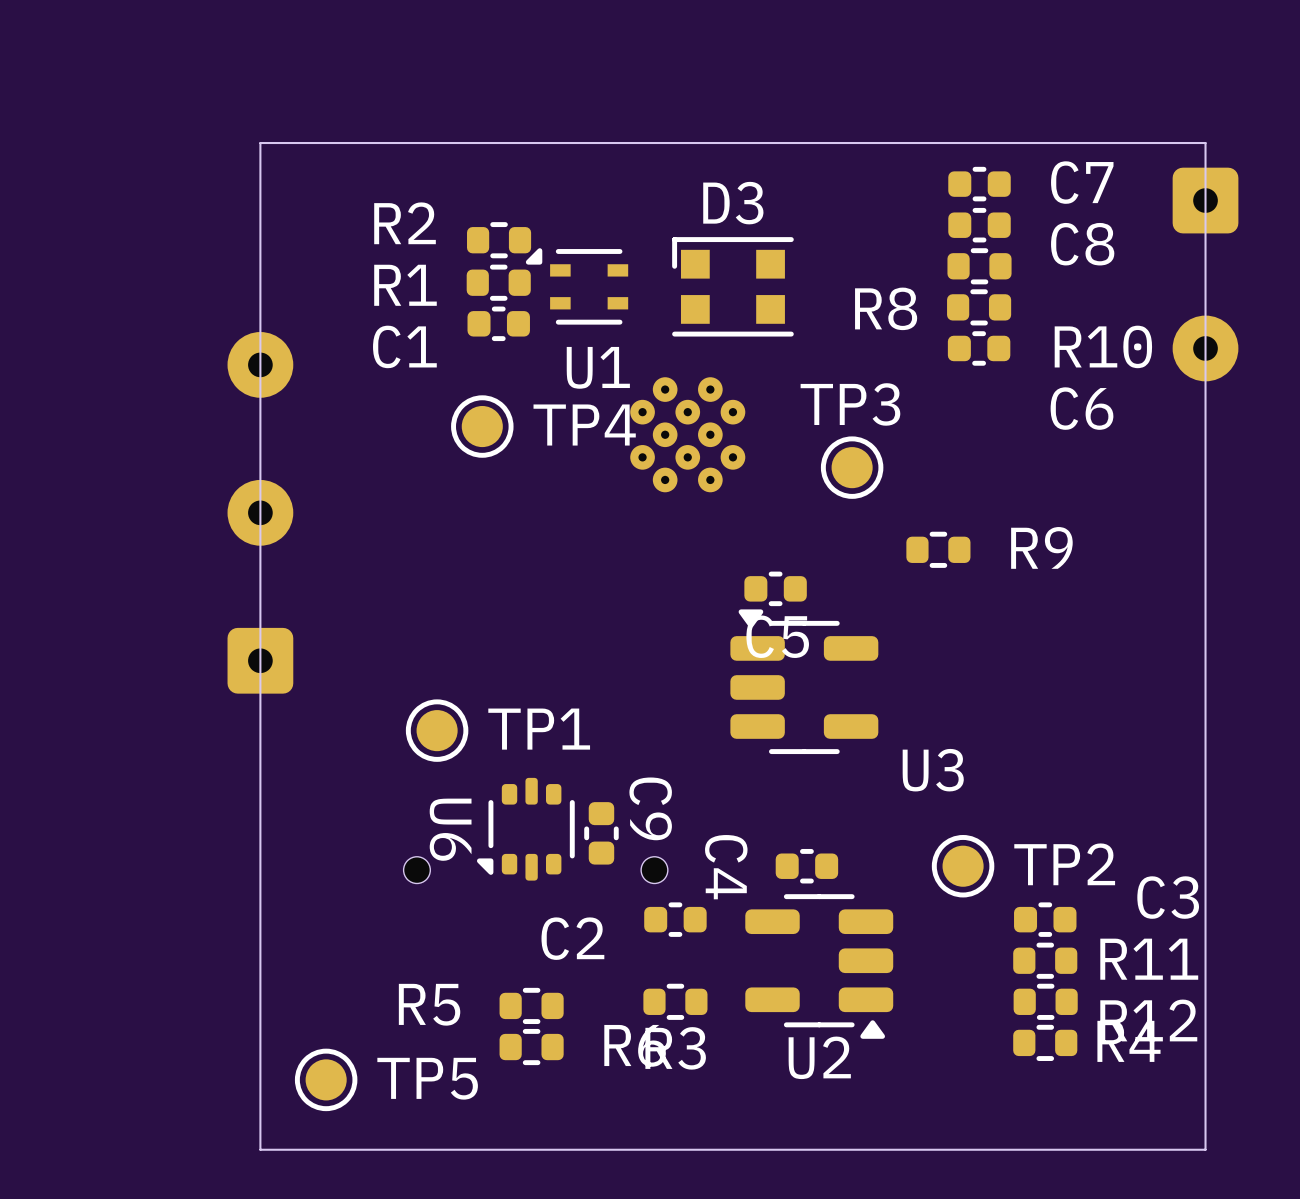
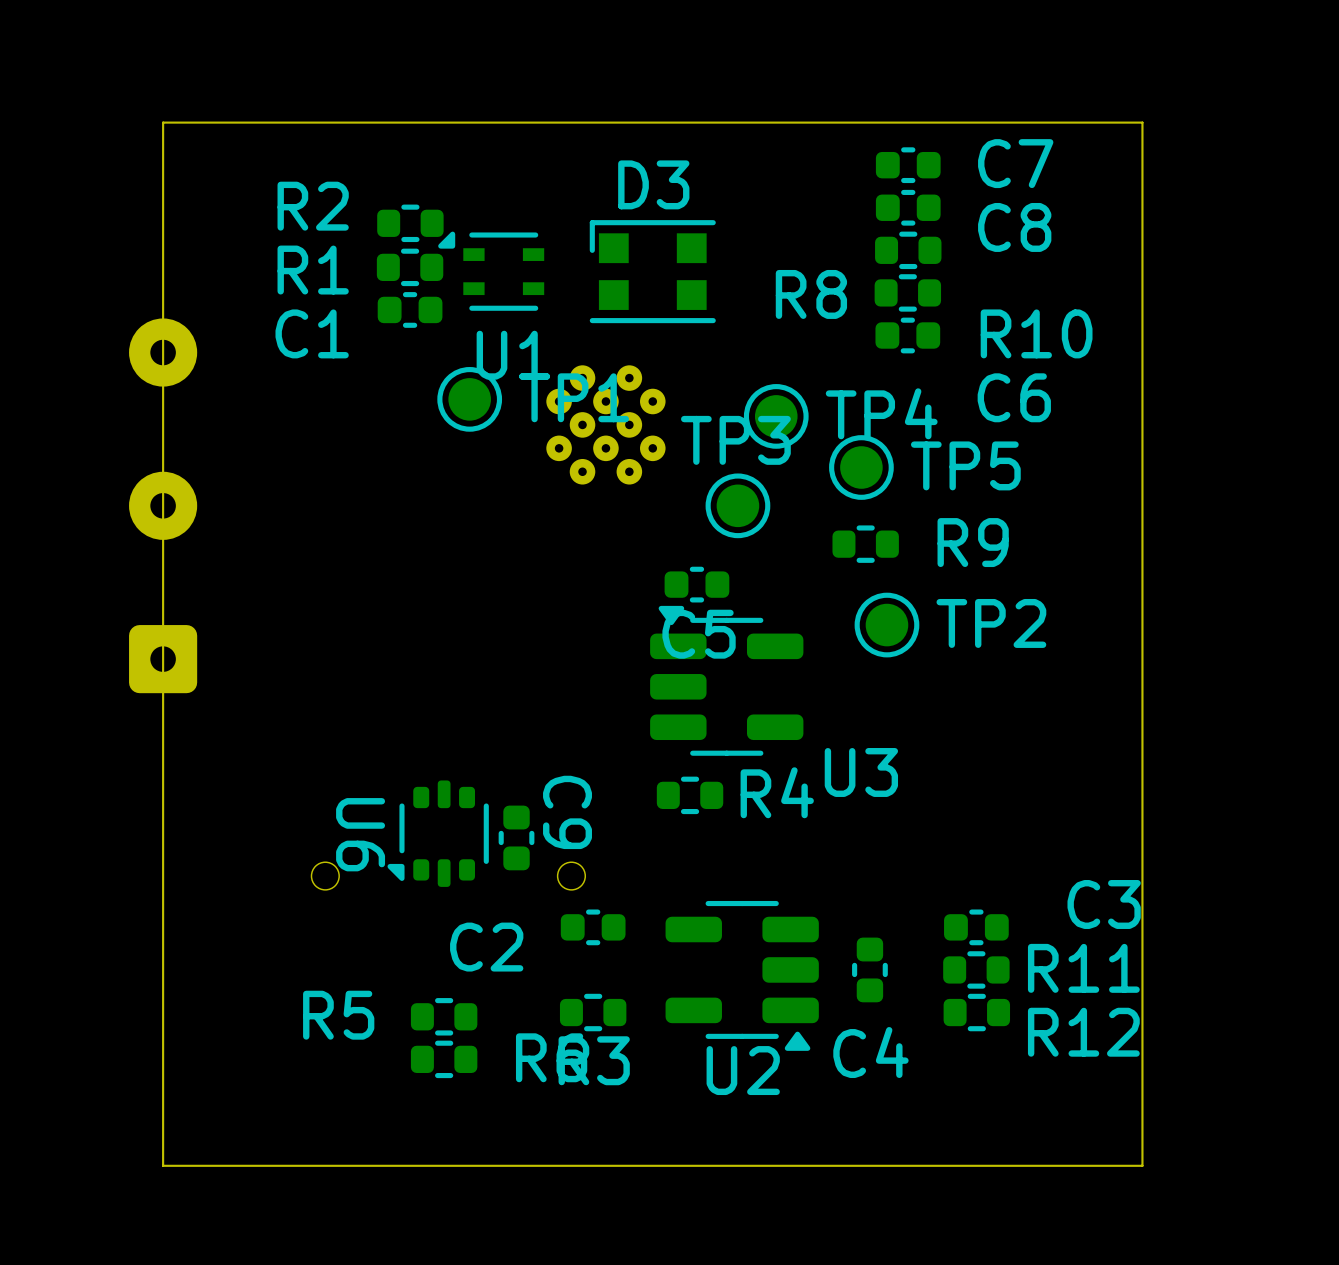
part: (1205, 274) -> none
TP4 position: (482, 426) -> (776, 416)
TP3 position: (852, 467) -> (737, 505)
TP1 position: (437, 730) -> (469, 399)
C4 rotation: 0° (806, 866) -> 90° clockwise (869, 969)
C4 position: (806, 866) -> (869, 969)
TP2 position: (963, 866) -> (886, 625)
C4 name position: C4 (726, 867) -> C4 (870, 1052)
R4 position: (1045, 1042) -> (690, 795)
TP5 position: (326, 1079) -> (861, 467)

